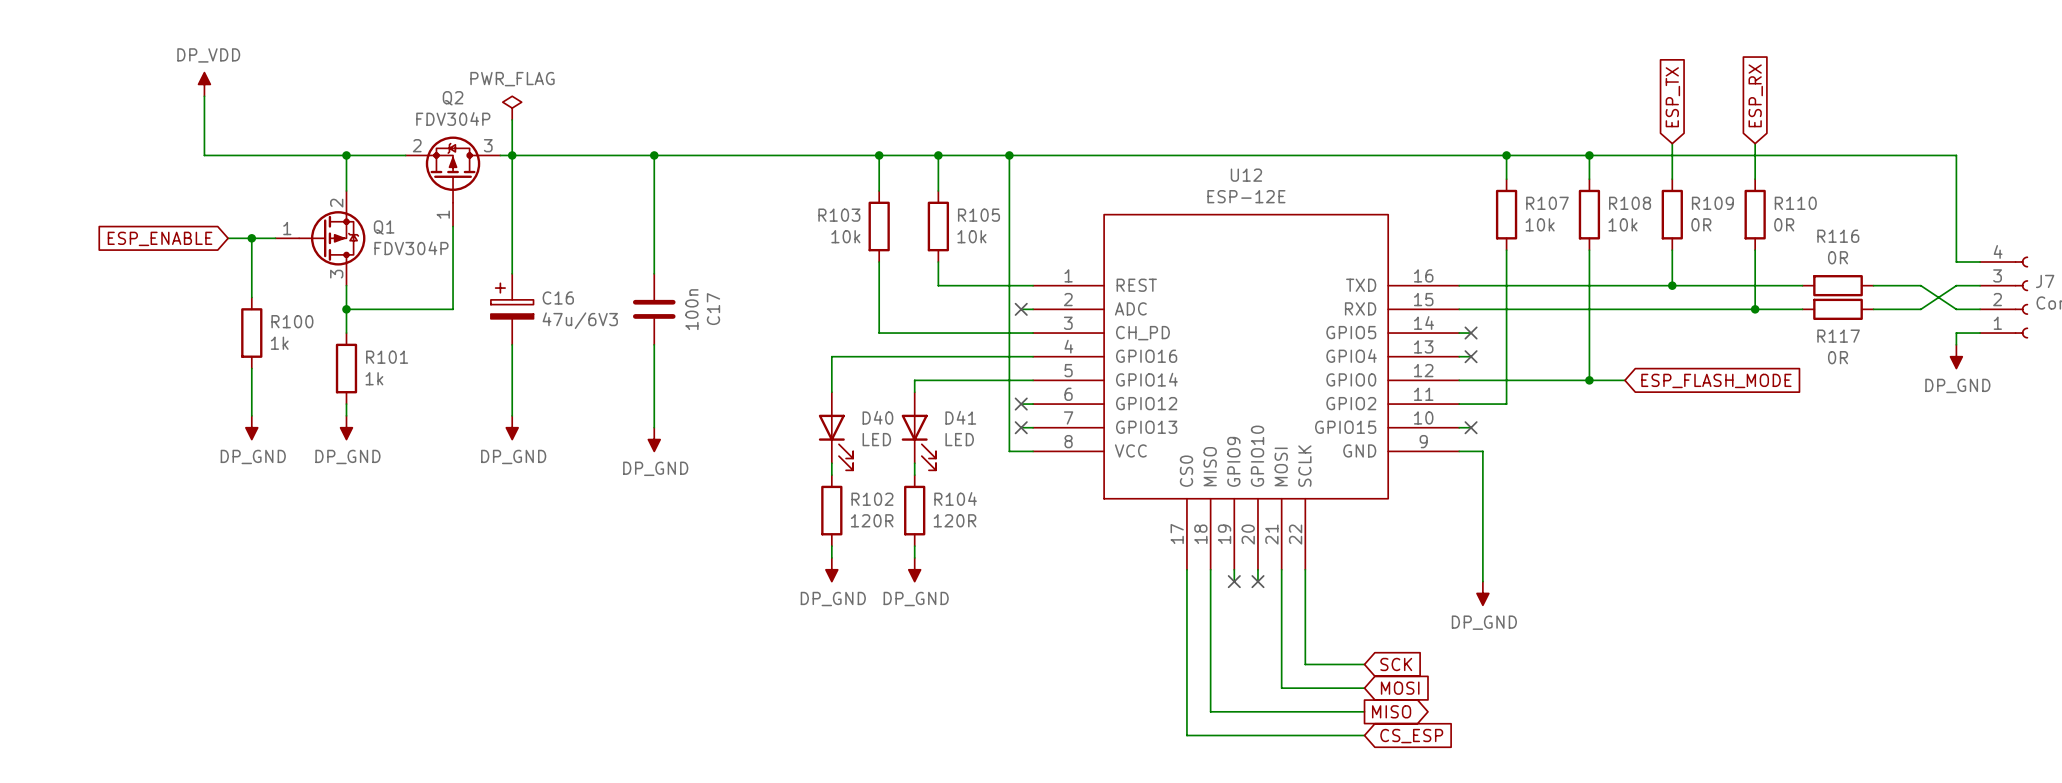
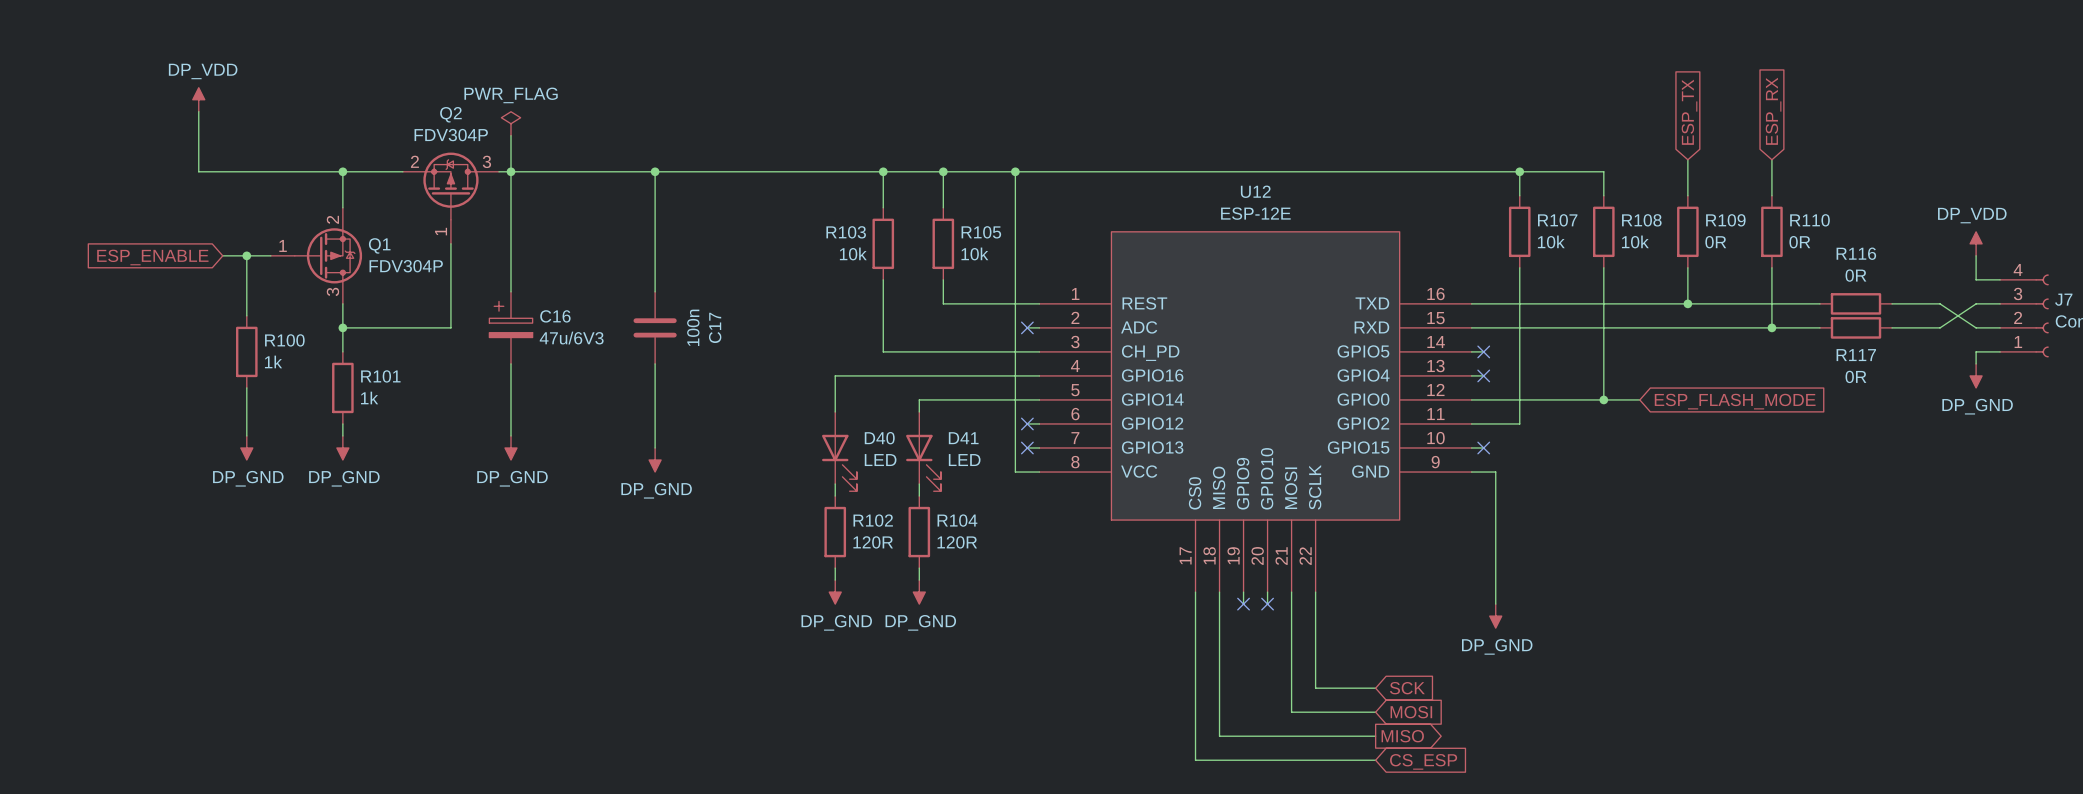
wire: (1589, 155) (1956, 155) (1956, 238) -> none
junction: (1589, 155) -> none
power symbol: none -> DP_VDD (1976, 243)

